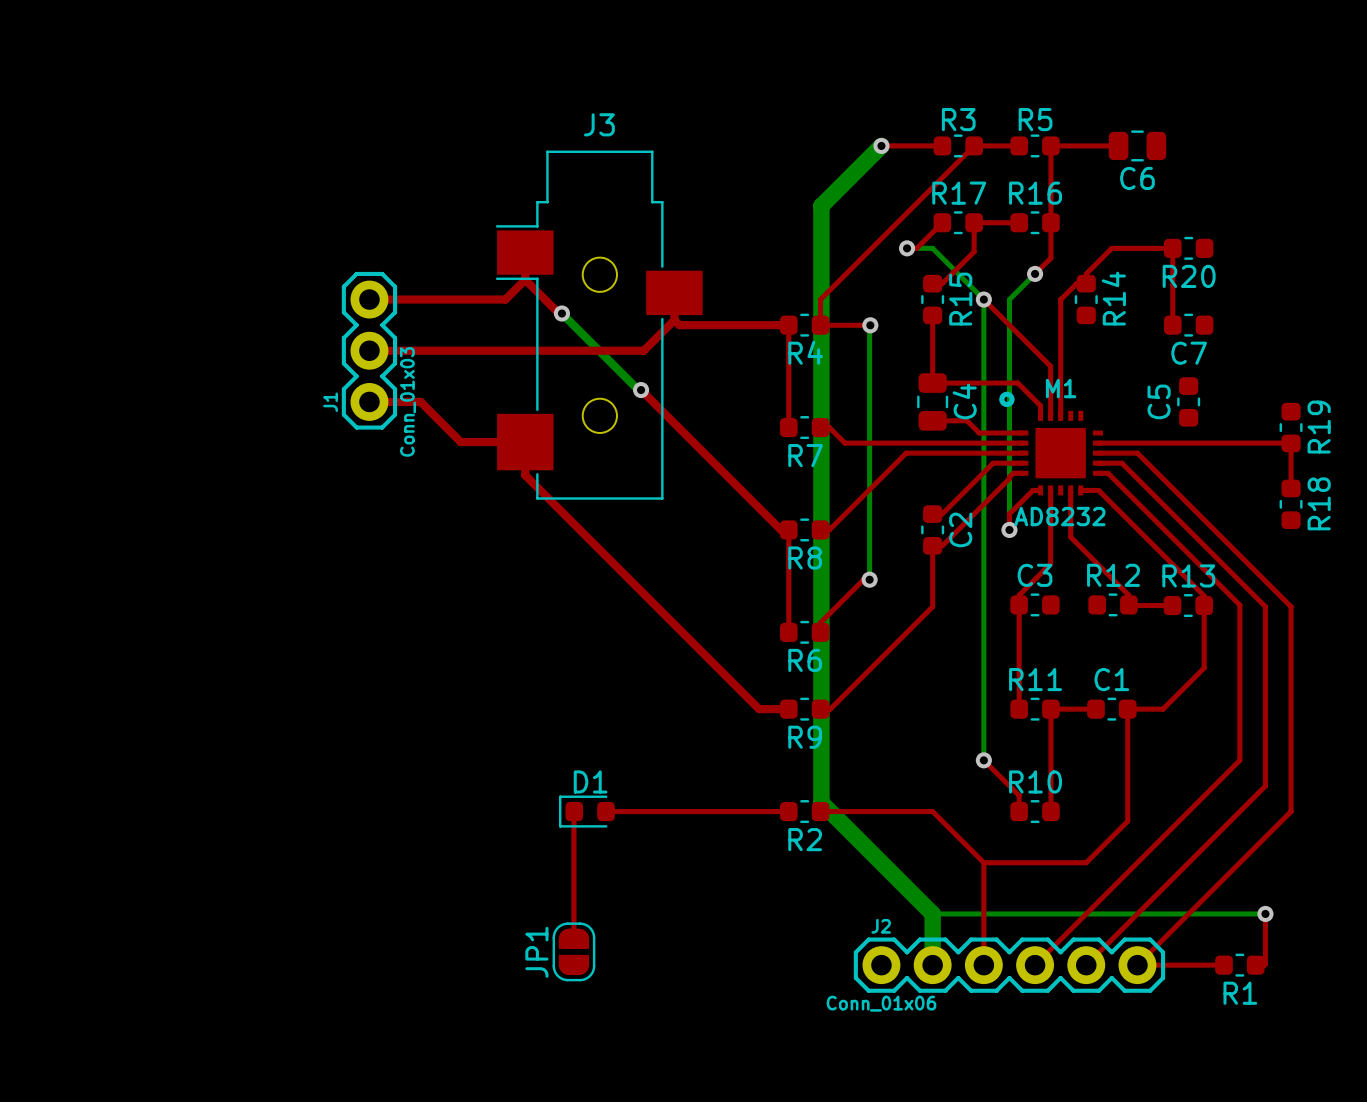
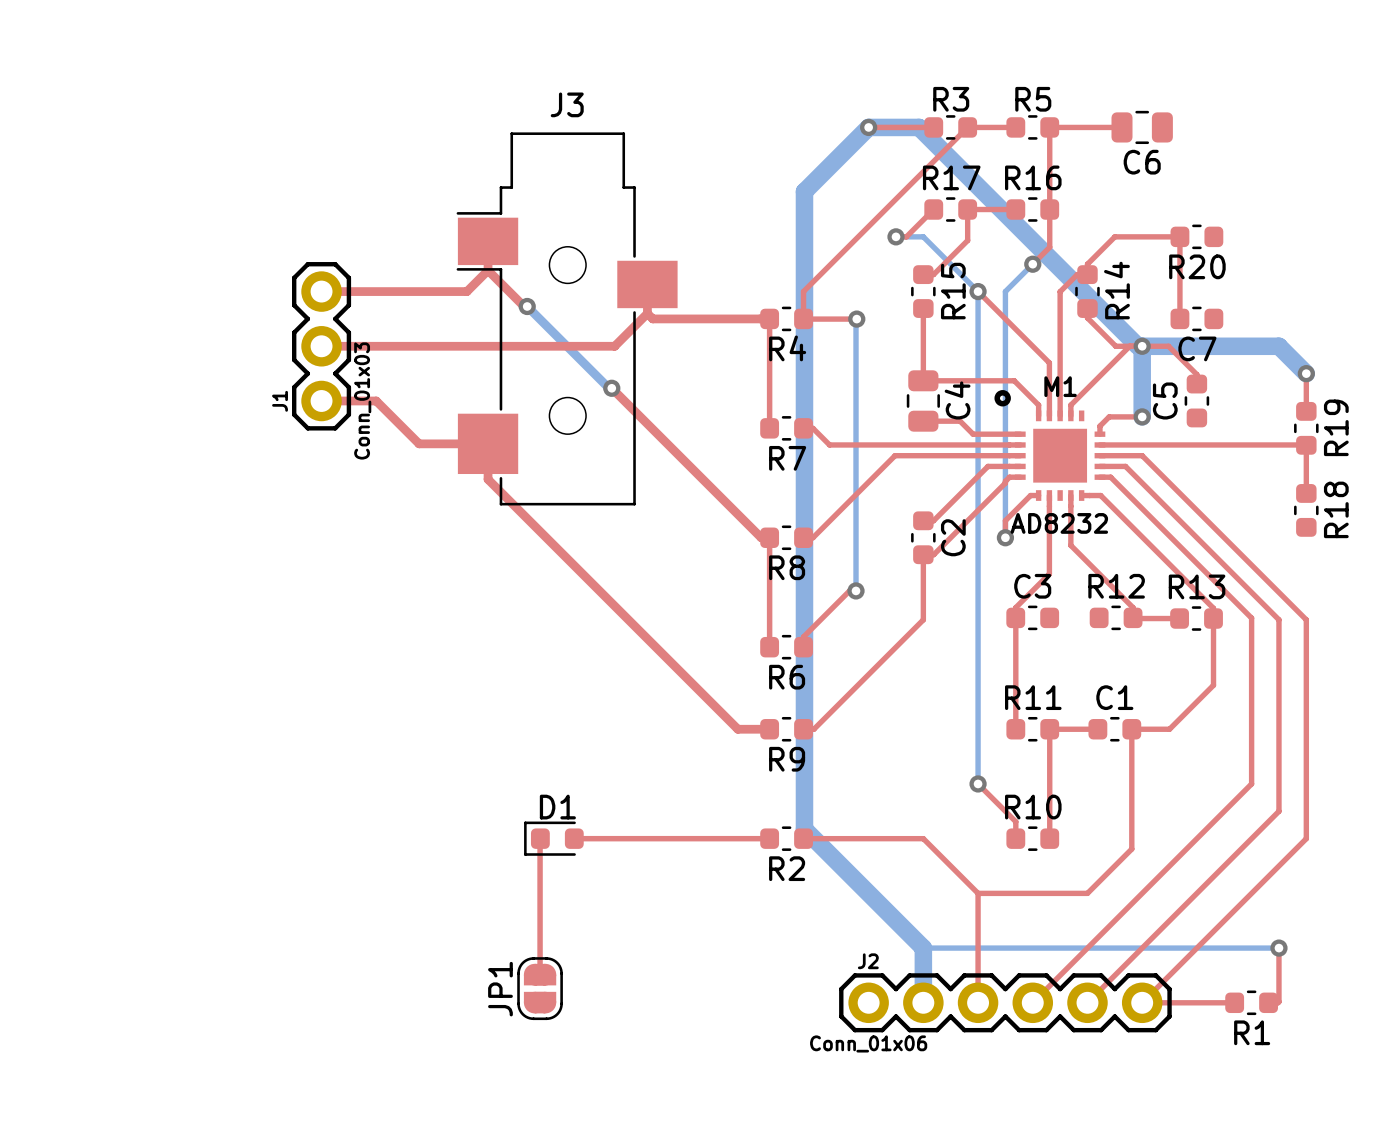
bottom track: none -> (868, 127) (919, 127) (1137, 346) (1142, 346)
top track: none -> (1087, 308) (1087, 317) (1115, 346) (1168, 346) (1196, 374) (1196, 384)
top track: none -> (1129, 346) (1070, 405) (1070, 415)
bottom track: none -> (1142, 346) (1278, 346) (1306, 373)
bottom track: none -> (1142, 346) (1142, 416)
via: none -> (1142, 346)
top track: none -> (1306, 373) (1306, 411)
via: none -> (1306, 373)
top track: none -> (1142, 416) (1109, 416) (1099, 426) (1099, 434)
via: none -> (1142, 416)

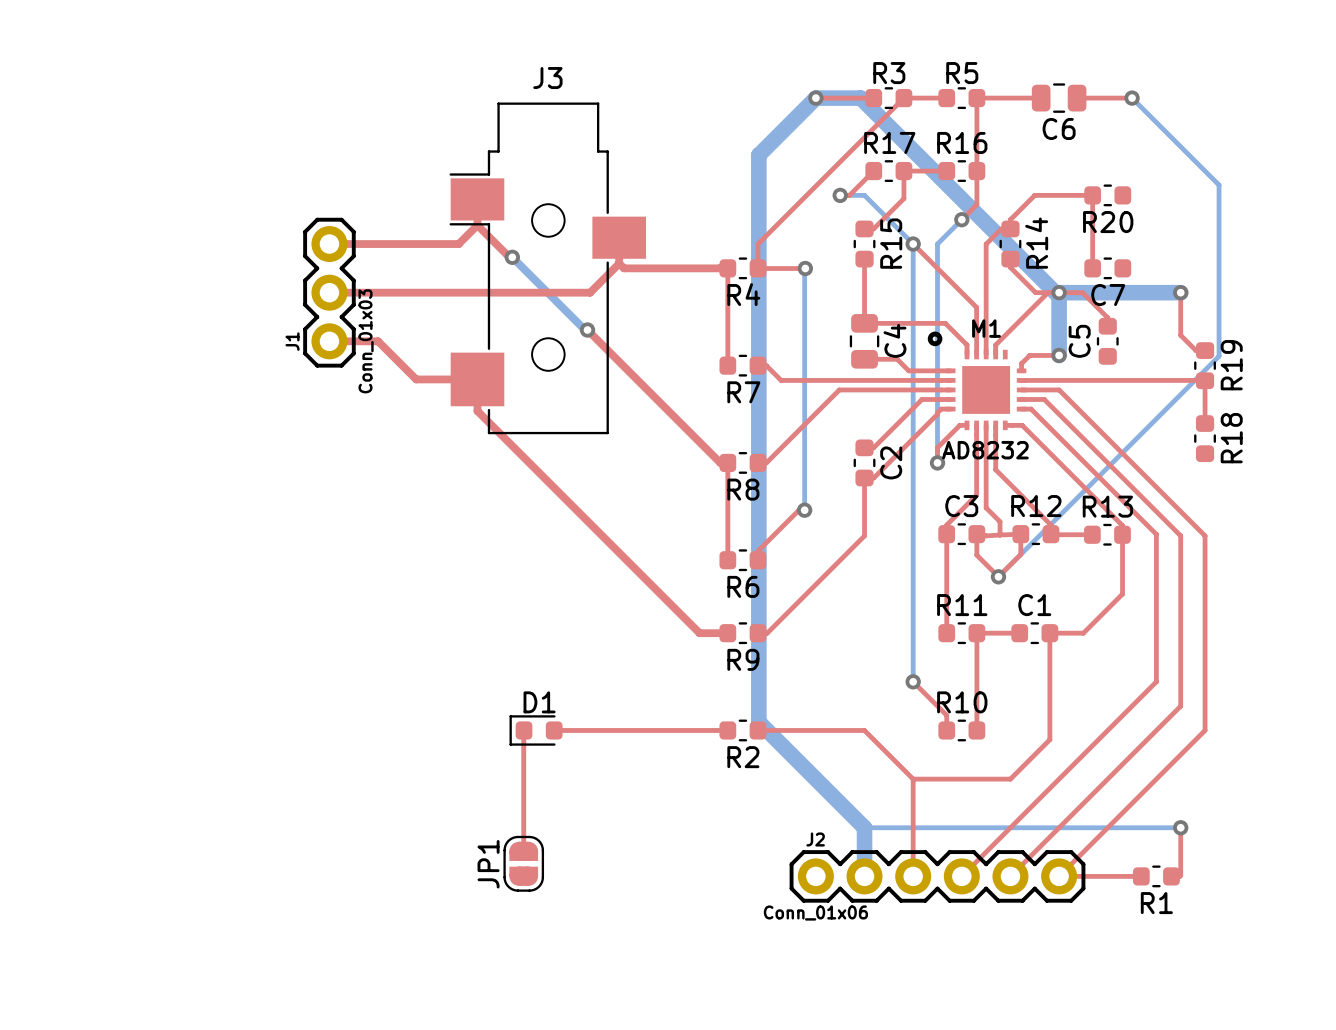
top track: none -> (1077, 98) (1132, 98)
bottom track: none -> (1132, 98) (1219, 185) (1219, 356) (998, 576)
via: none -> (1132, 98)
bottom track: (1278, 346) (1306, 373) -> none
top track: (1306, 373) (1306, 411) -> (1180, 292) (1180, 335) (1195, 350) (1205, 350)
via position: (1306, 373) -> (1180, 292)
top track: none -> (986, 425) (986, 507) (1000, 521) (1000, 535)
top track: none -> (1000, 535) (976, 534) (976, 555) (998, 576) (1020, 554) (1020, 534) (1000, 535)
via: none -> (998, 576)

